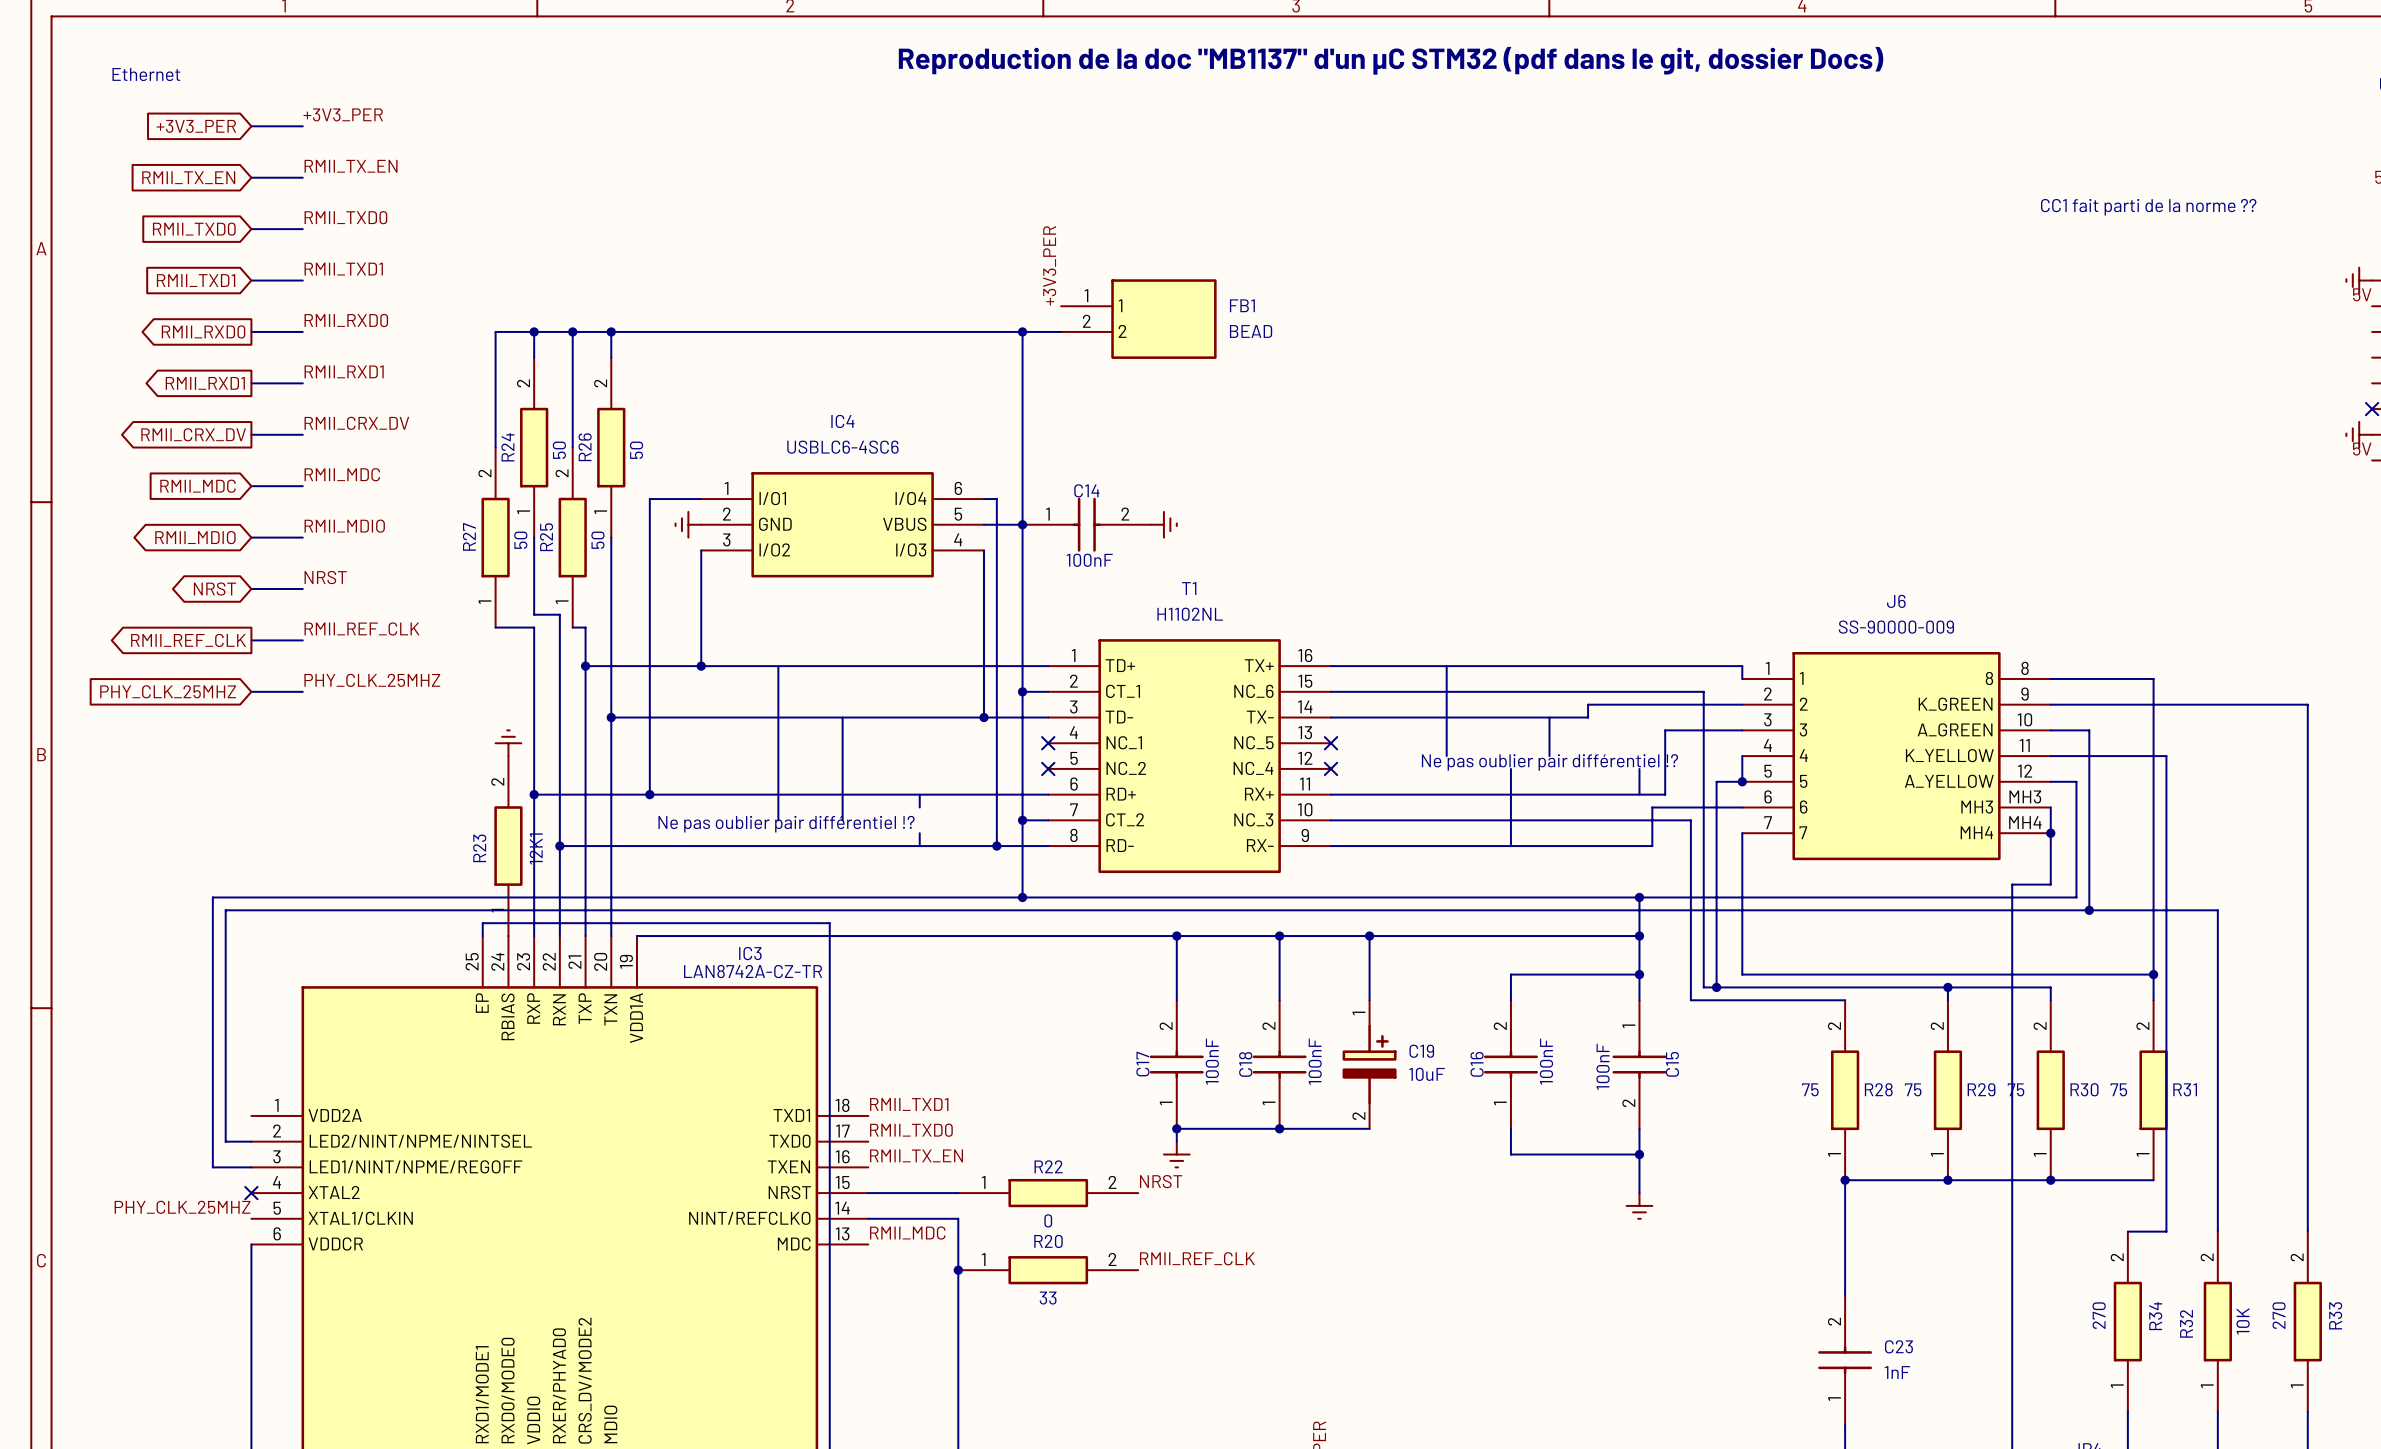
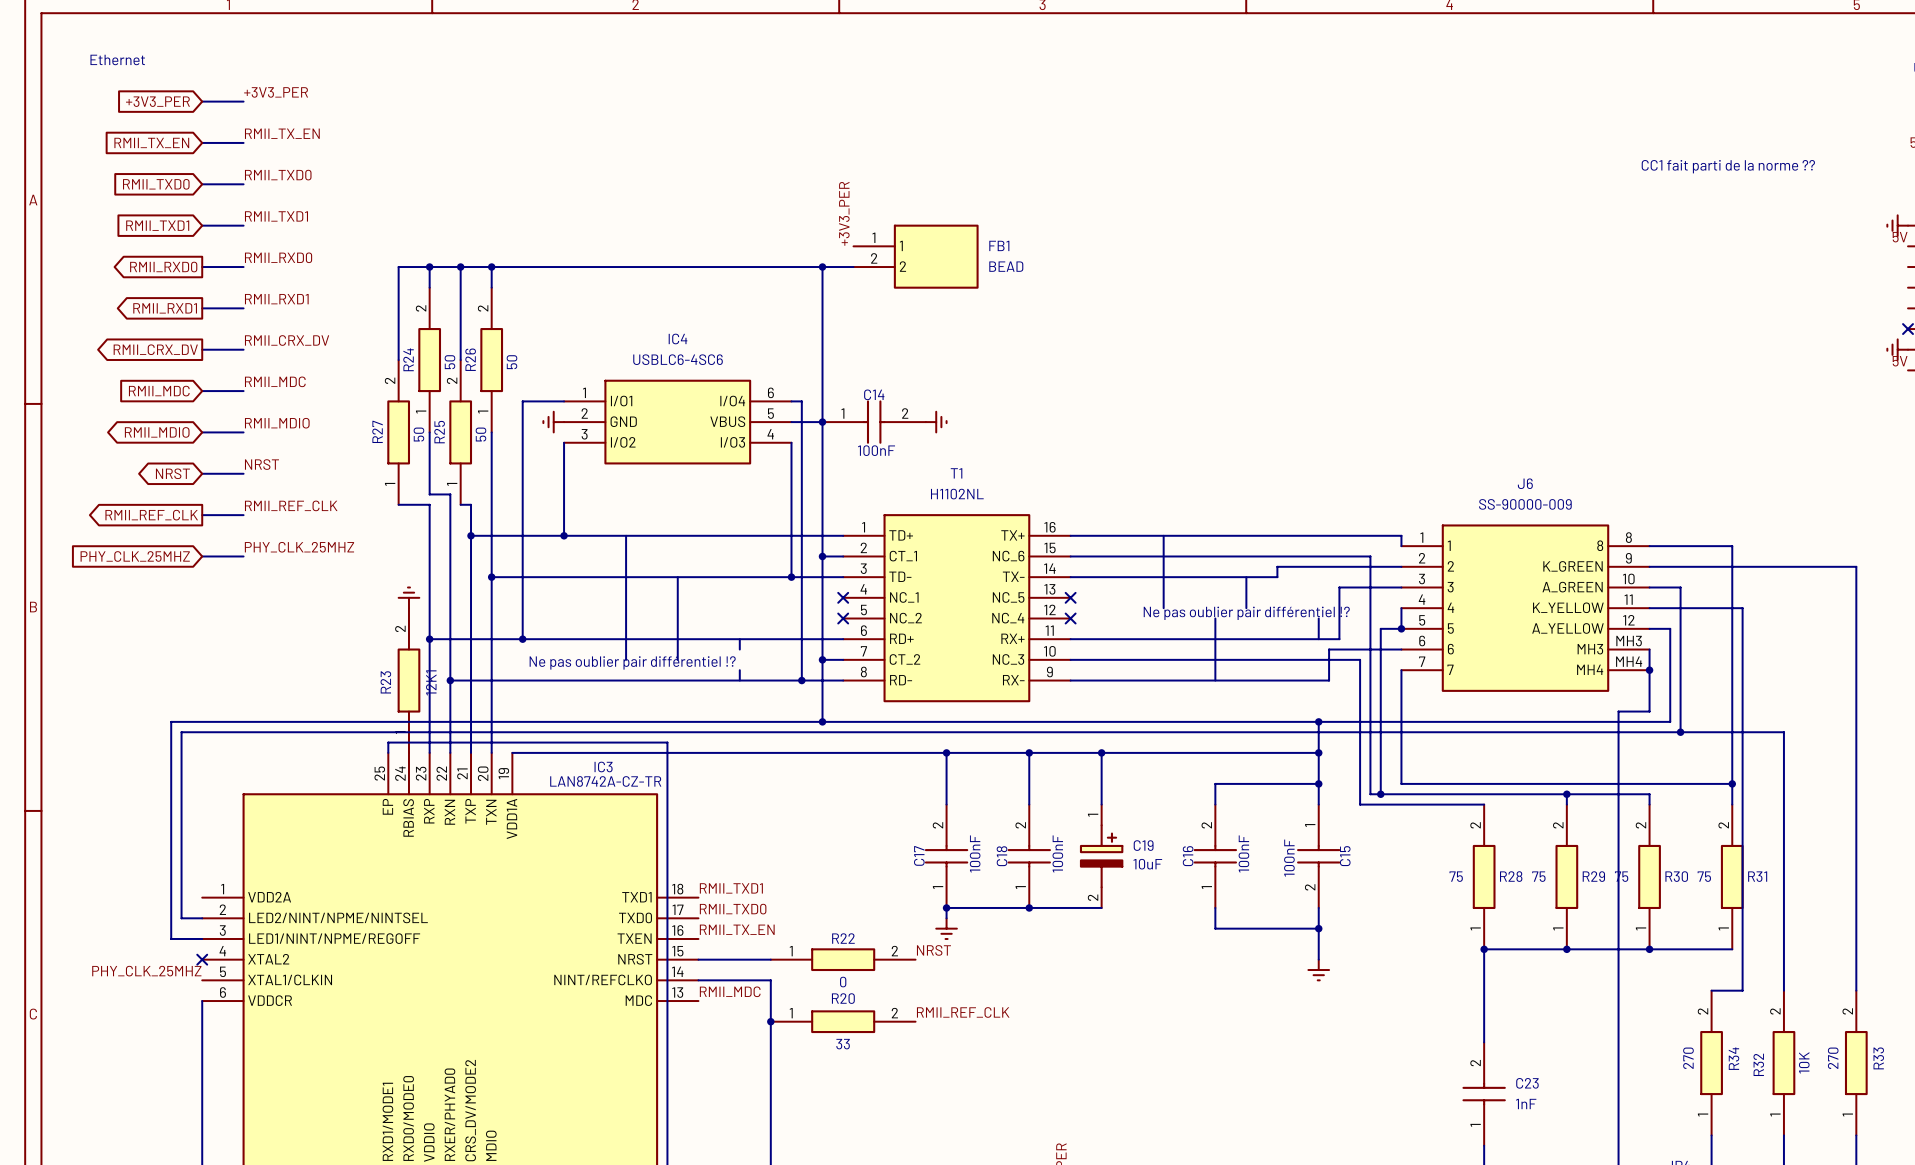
text: Reproduction de la doc "MB1137" d'un µC STM32 (pdf dans le git, dossier Docs) (1391, 60) -> none

